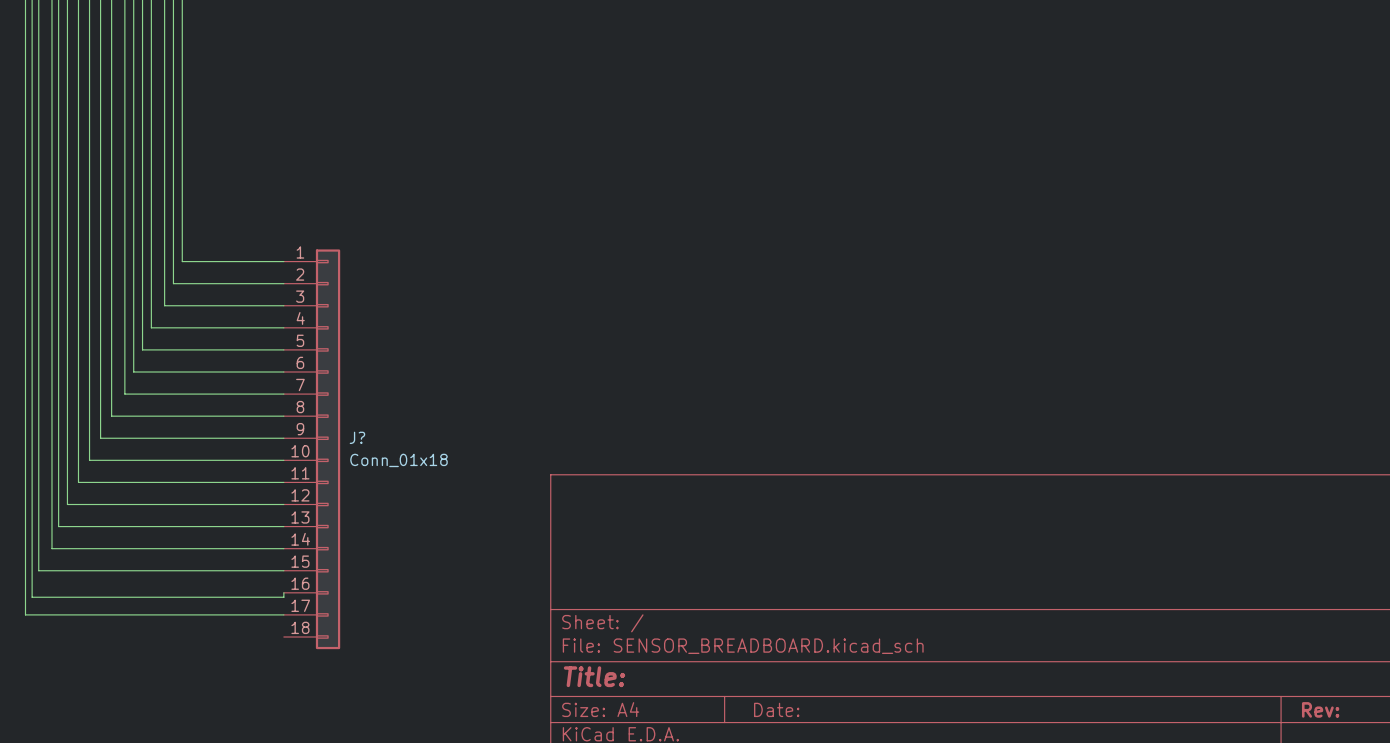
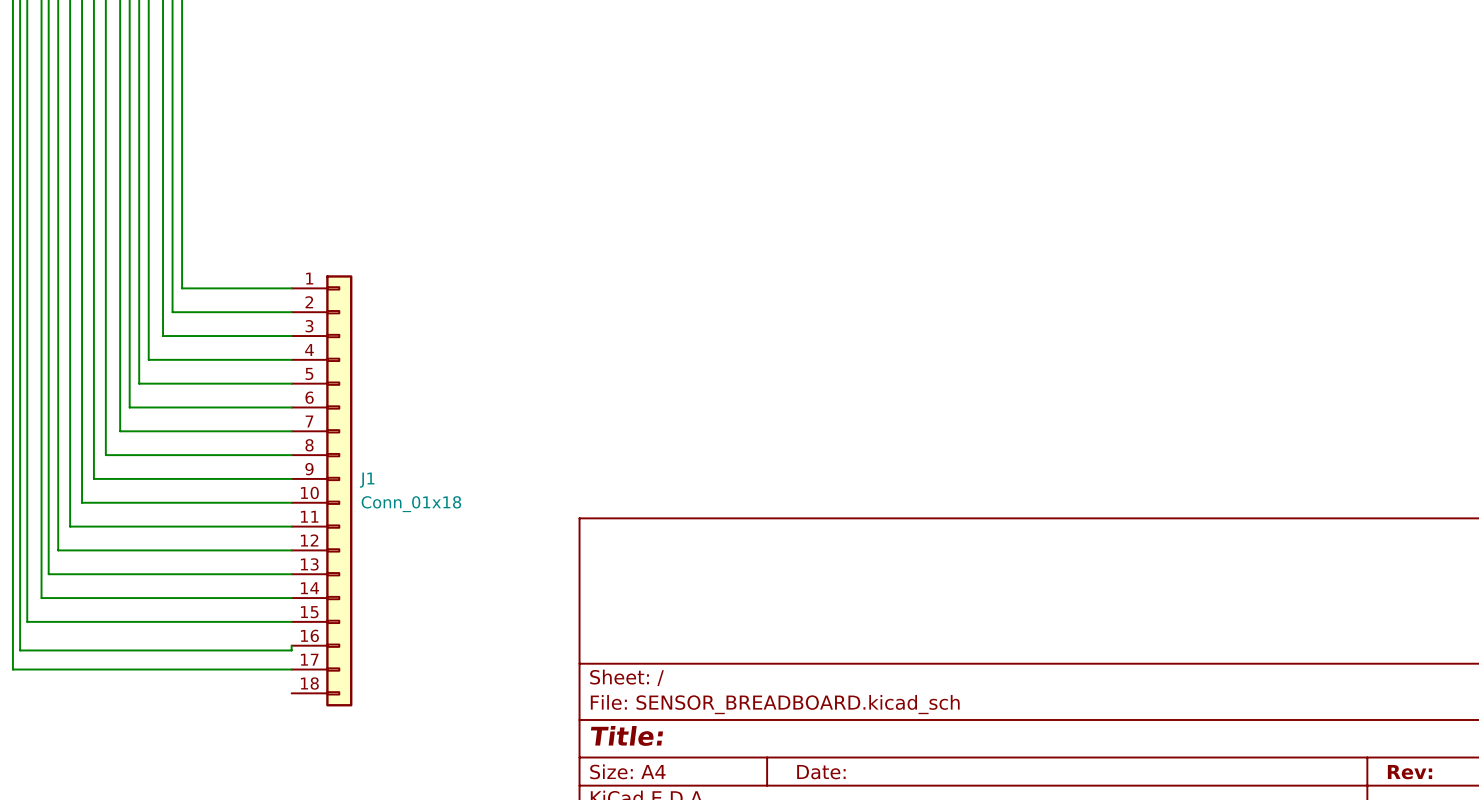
J? name: J? (357, 437) -> J1 (367, 480)

